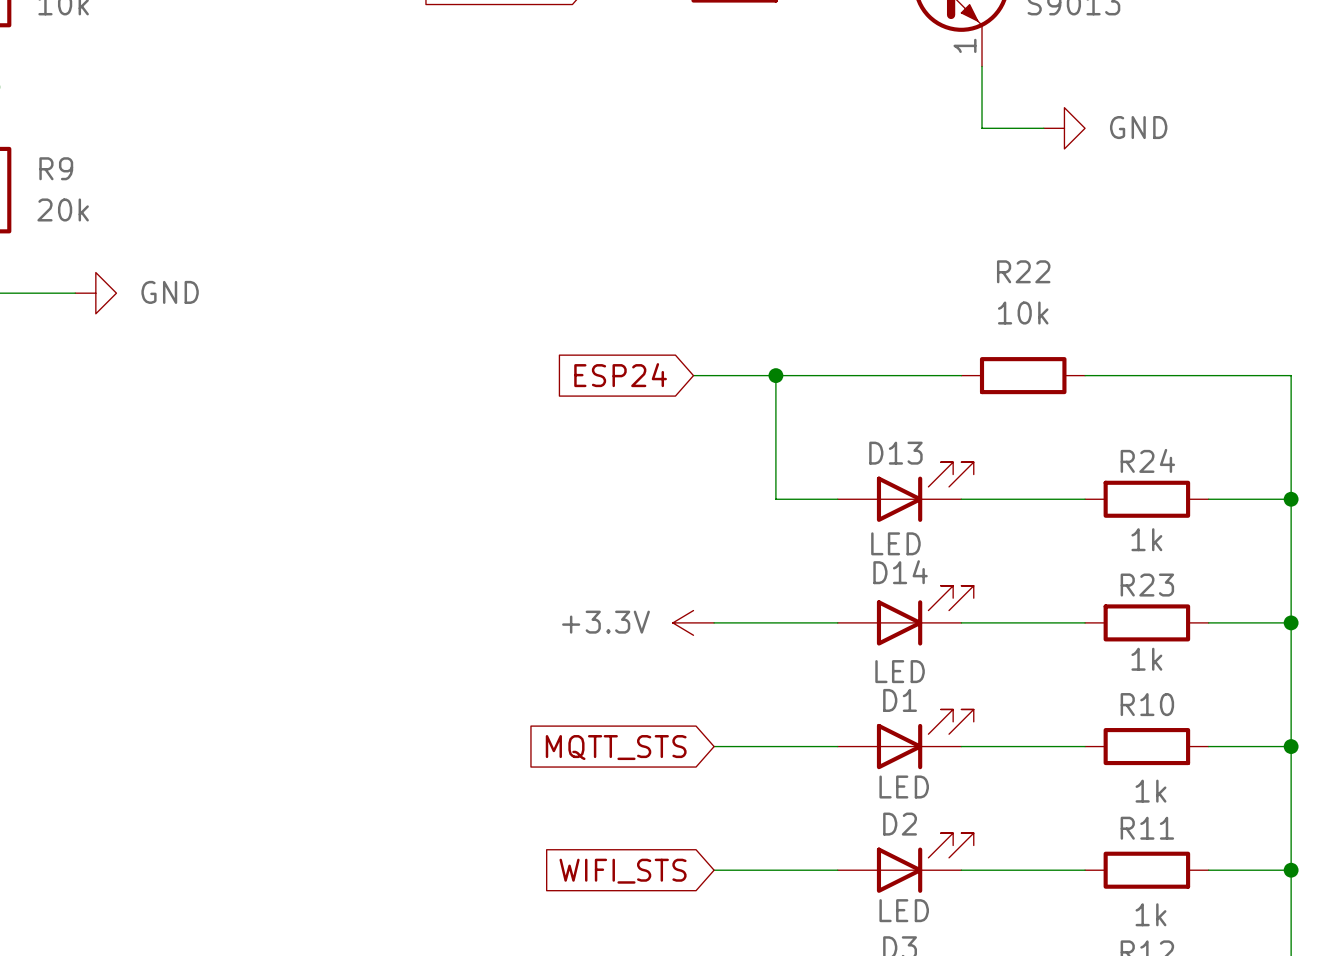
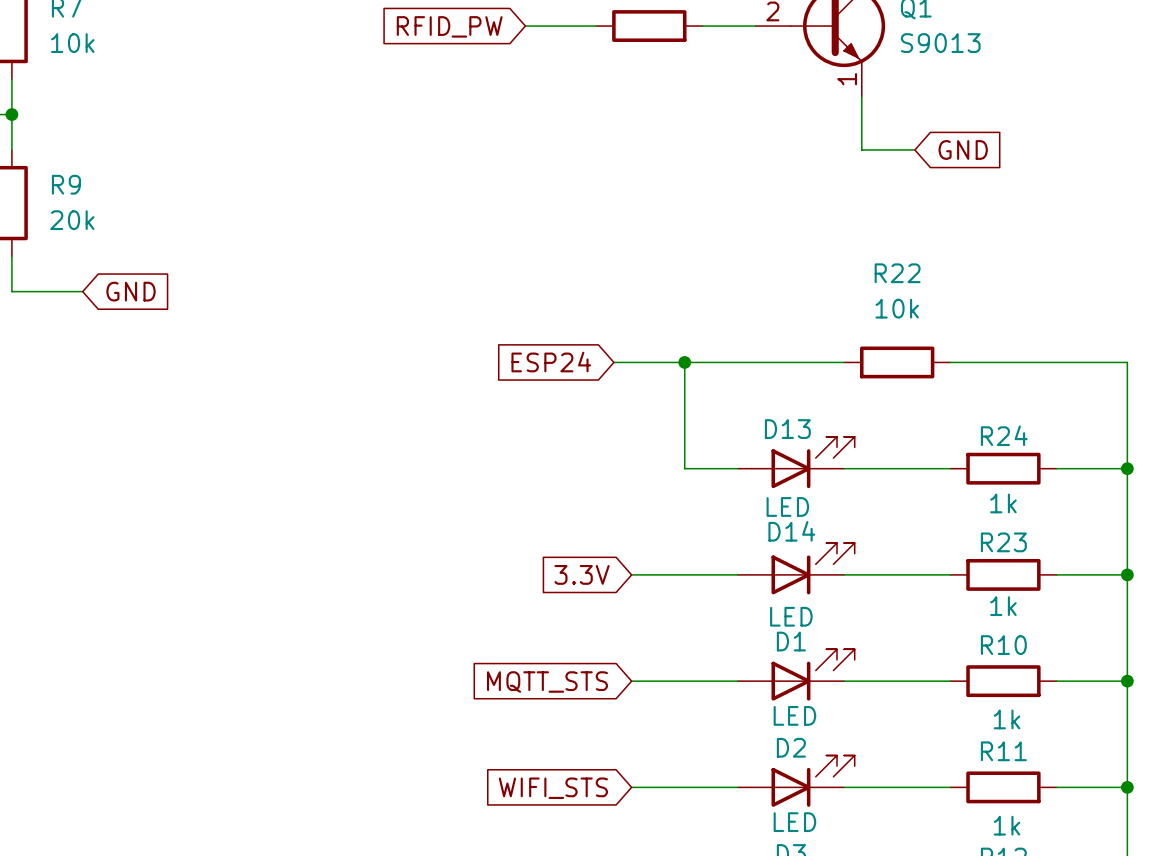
power symbol: GND (1064, 128) -> none
global label: none -> GND (963, 149)
power symbol: GND (95, 293) -> none
global label: none -> GND (131, 291)
global label: none -> 3.3V (582, 574)
power symbol: +3.3V (693, 622) -> none

